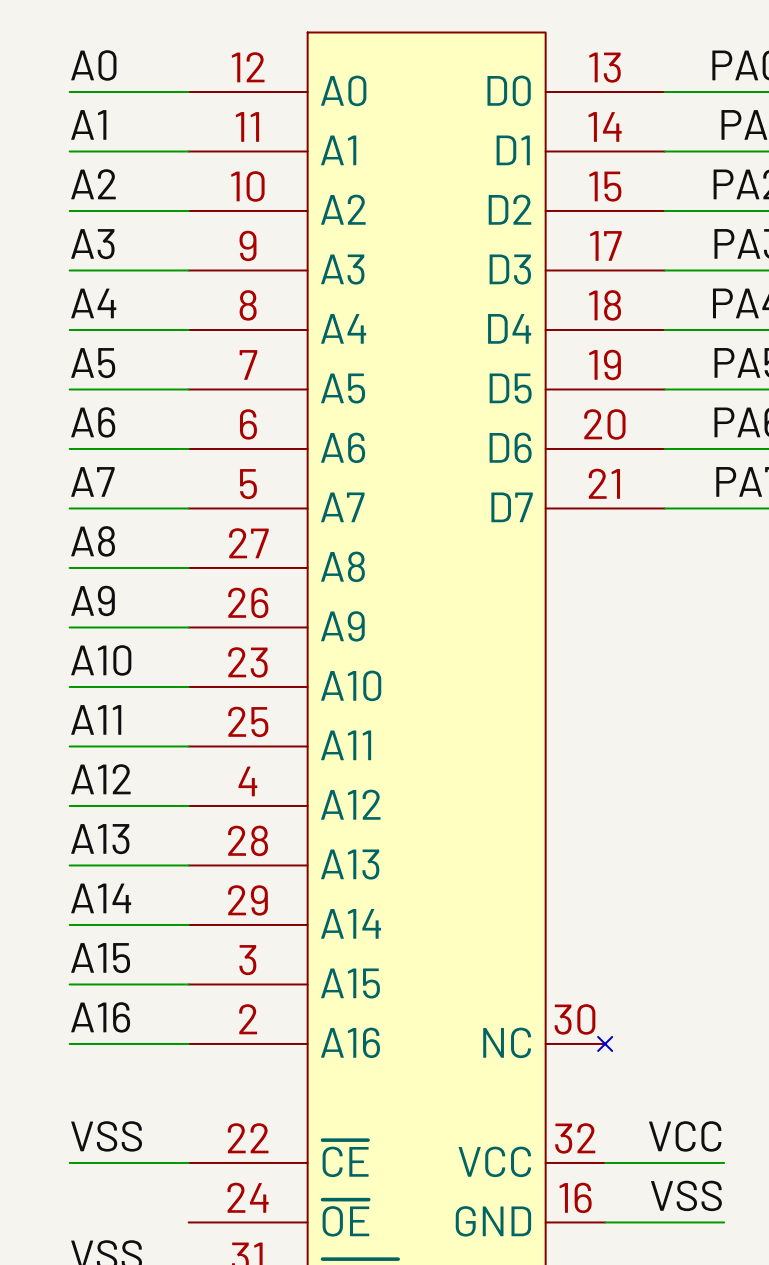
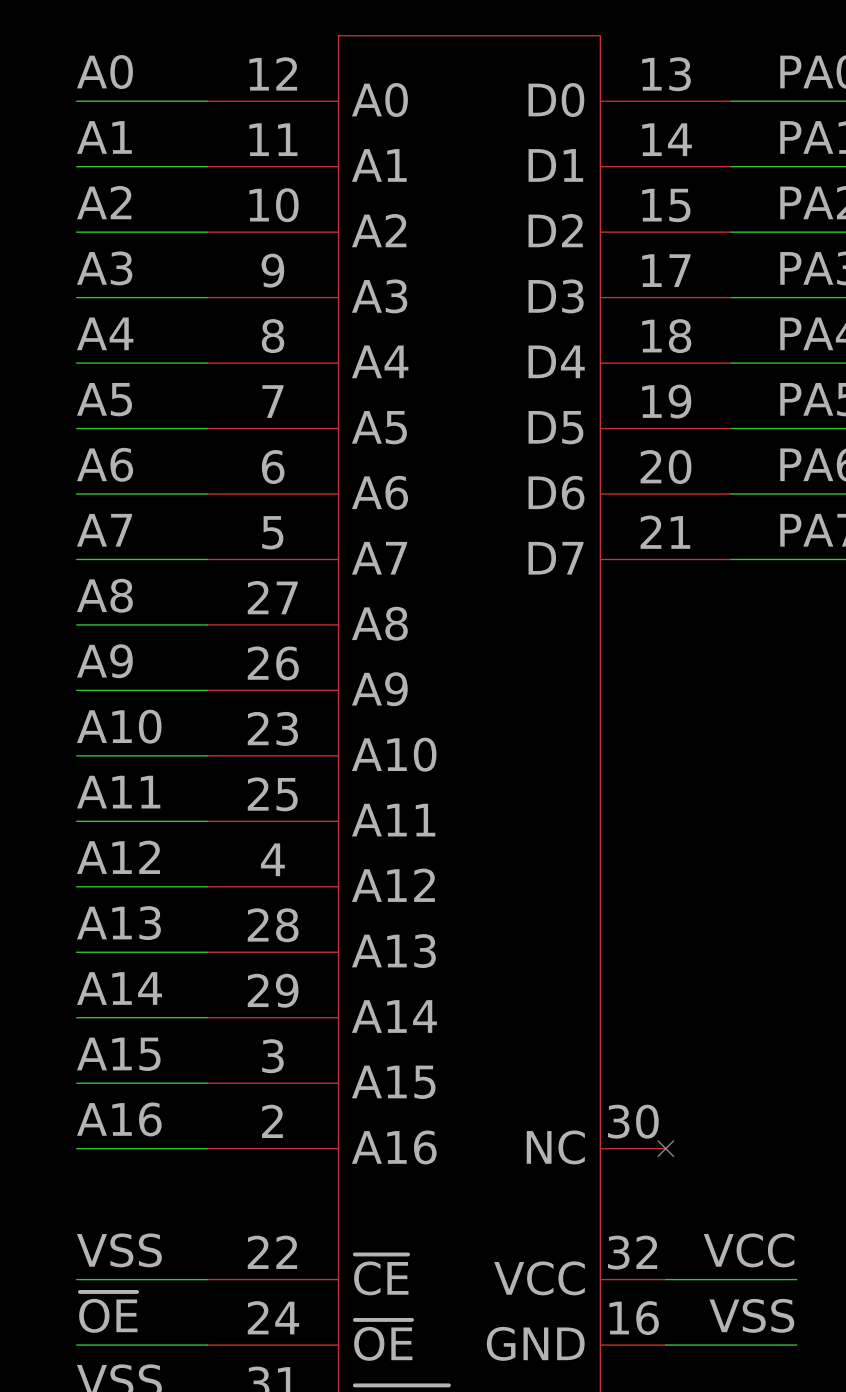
label: none -> ~{OE} (108, 1312)
wire: none -> (76, 1345) (207, 1345)

